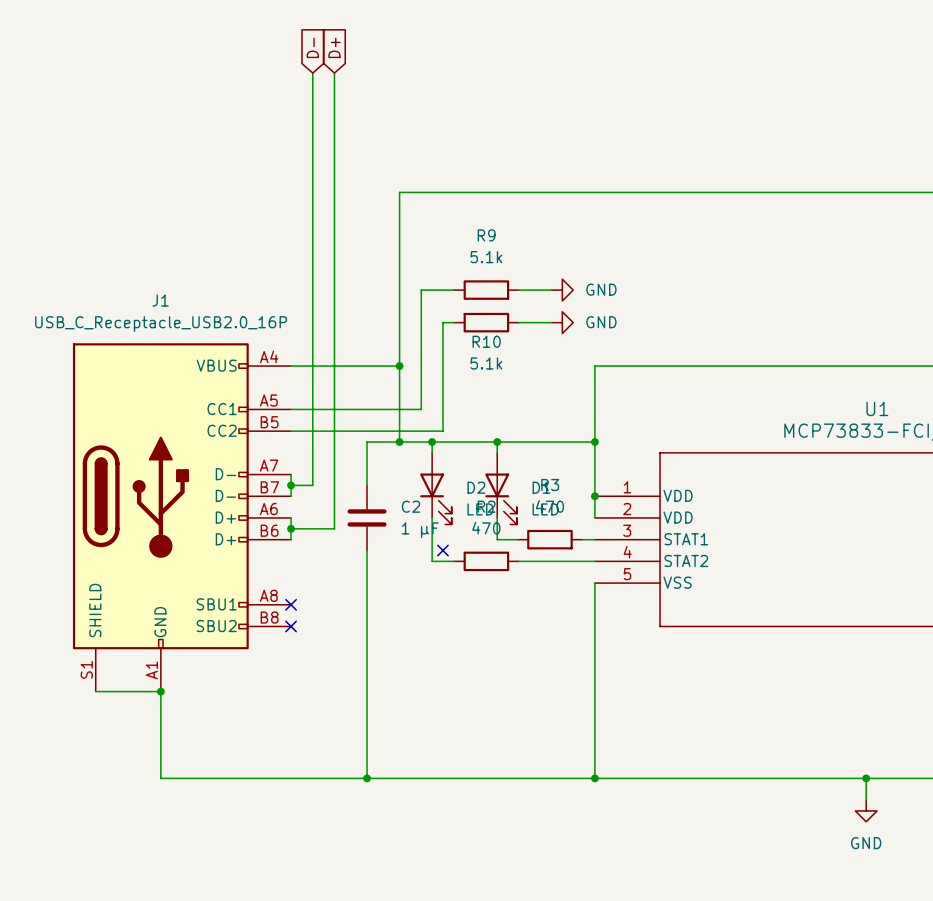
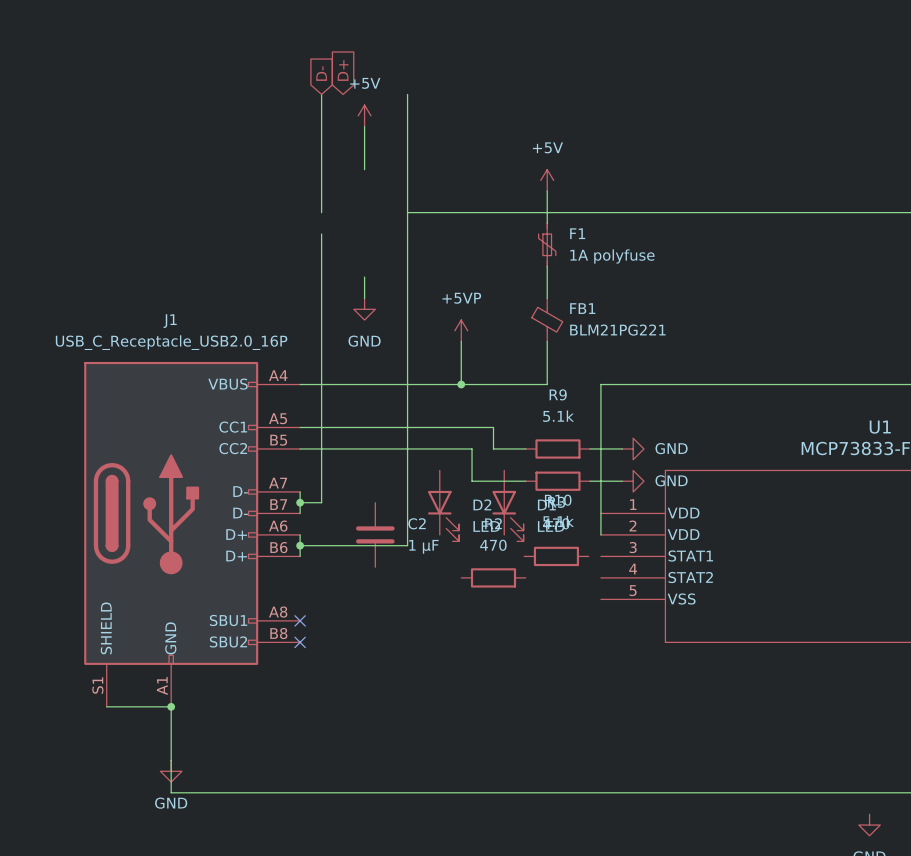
wire: (334, 73) (334, 528) -> (407, 459) (407, 545) (343, 545)
wire: none -> (407, 94) (407, 212)
power symbol: none -> +5V (364, 115)
wire: none -> (364, 126) (364, 169)
power symbol: none -> +5V (547, 180)
wire: none -> (547, 191) (547, 223)
wire: (312, 192) (312, 214) -> (364, 277) (364, 298)
F1: none -> 1A polyfuse (547, 244)
wire: none -> (547, 266) (547, 298)
power symbol: none -> GND (364, 309)
wire: (453, 290) (421, 290) (421, 409) -> (525, 448) (493, 448) (493, 427) (429, 427)
R9 position: (486, 290) -> (557, 448)
wire: (518, 290) (551, 290) -> (590, 448) (622, 448)
power symbol: GND (562, 290) -> none
FB1: none -> BLM21PG221 (547, 320)
power symbol: none -> +5VP (461, 330)
wire: (453, 322) (442, 322) (442, 431) -> (461, 341) (461, 384)
R10 position: (486, 322) -> (557, 481)
wire: (518, 322) (551, 322) -> (590, 481) (622, 481)
wire: none -> (547, 341) (547, 384) (407, 384)
power symbol: GND (562, 322) -> none
junction: (399, 366) -> none
junction: none -> (461, 384)
wire: none -> (450, 448) (472, 448) (472, 481) (525, 481)
power symbol: none -> GND (633, 448)
junction: (399, 442) -> none
wire: (432, 442) (432, 452) -> none
junction: (432, 442) -> none
wire: (497, 442) (497, 452) -> none
junction: (497, 442) -> none
wire: (594, 442) (367, 442) (367, 485) -> none
junction: (594, 442) -> none
power symbol: none -> GND (633, 481)
junction: (594, 496) -> none
wire: (432, 517) (432, 561) (453, 561) -> none
wire: (497, 517) (497, 539) (517, 539) -> none
wire: (582, 539) (594, 539) -> none
wire: (367, 550) (367, 778) -> none
no-connect mark: (442, 550) -> none
wire: (518, 561) (594, 561) -> none
wire: (594, 583) (594, 778) -> none
power symbol: none -> GND (171, 771)
junction: (367, 778) -> none
junction: (594, 778) -> none
wire: (866, 778) (866, 800) -> none
junction: (866, 778) -> none

